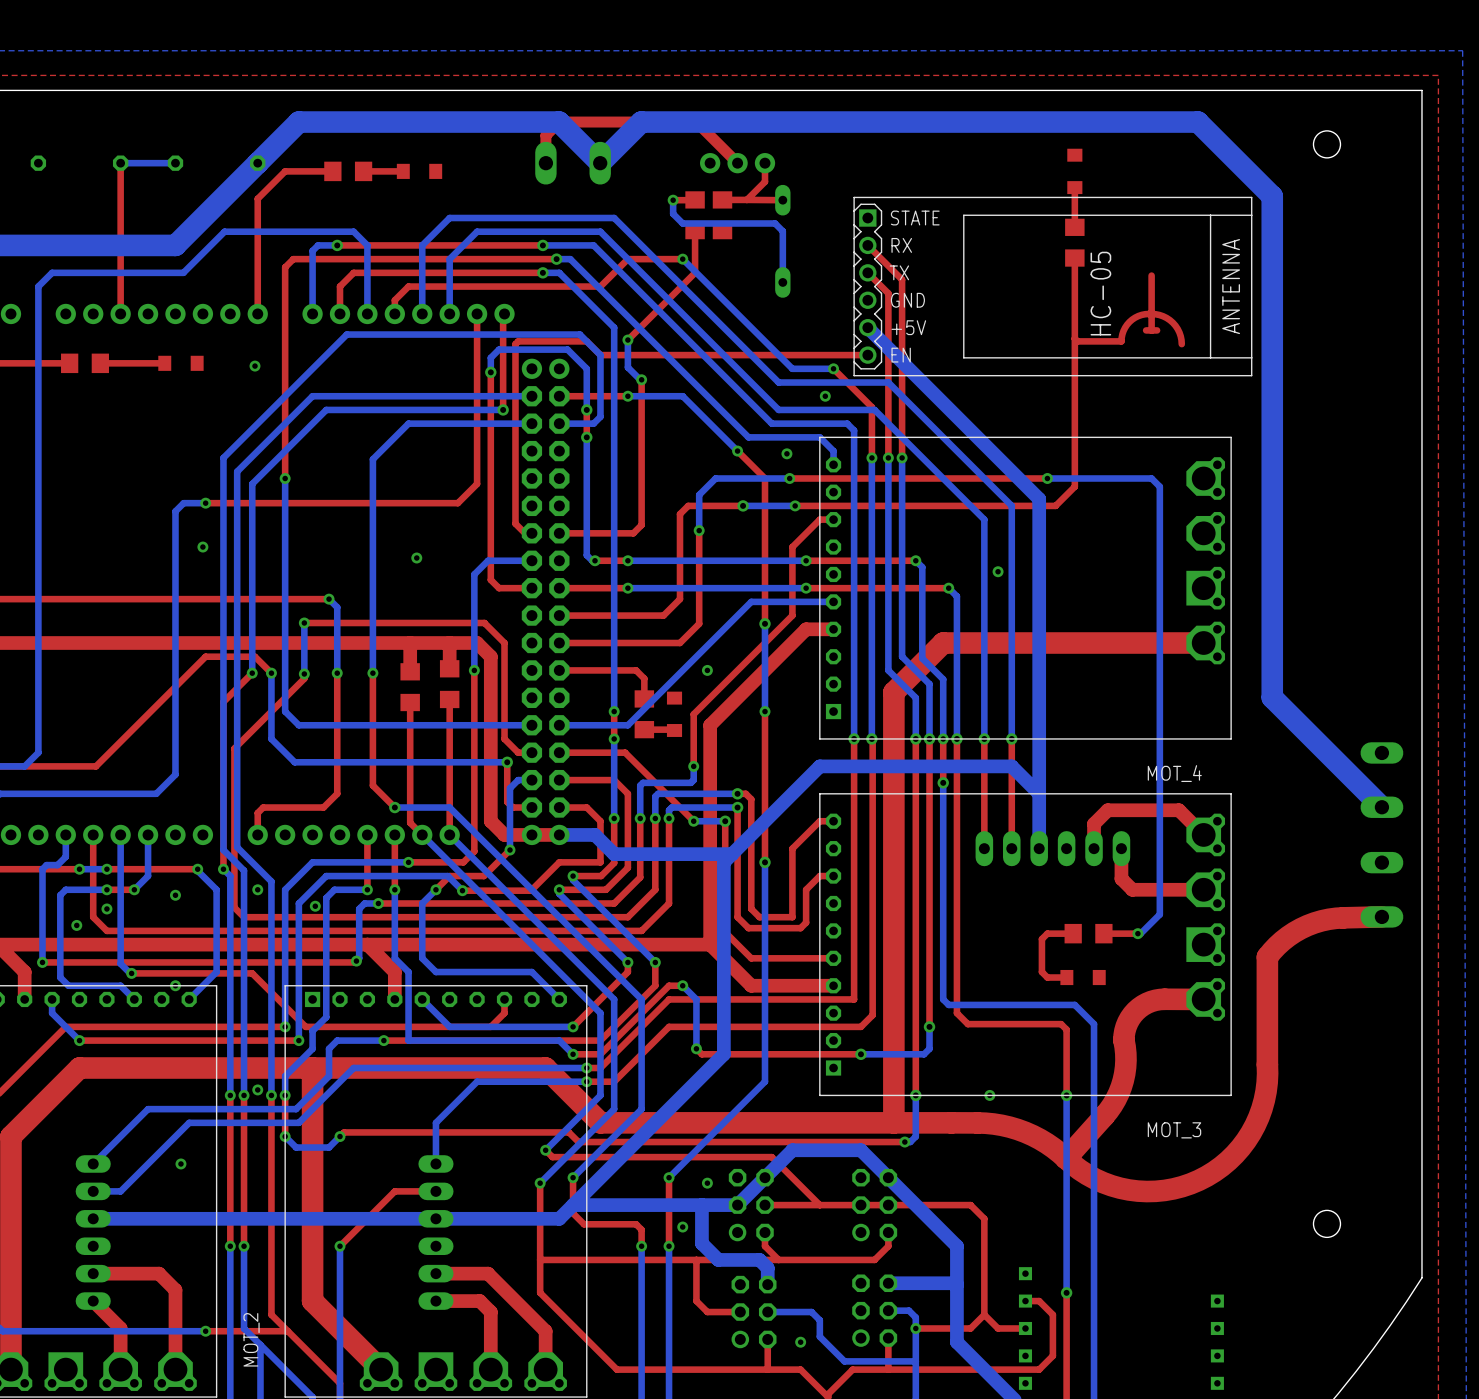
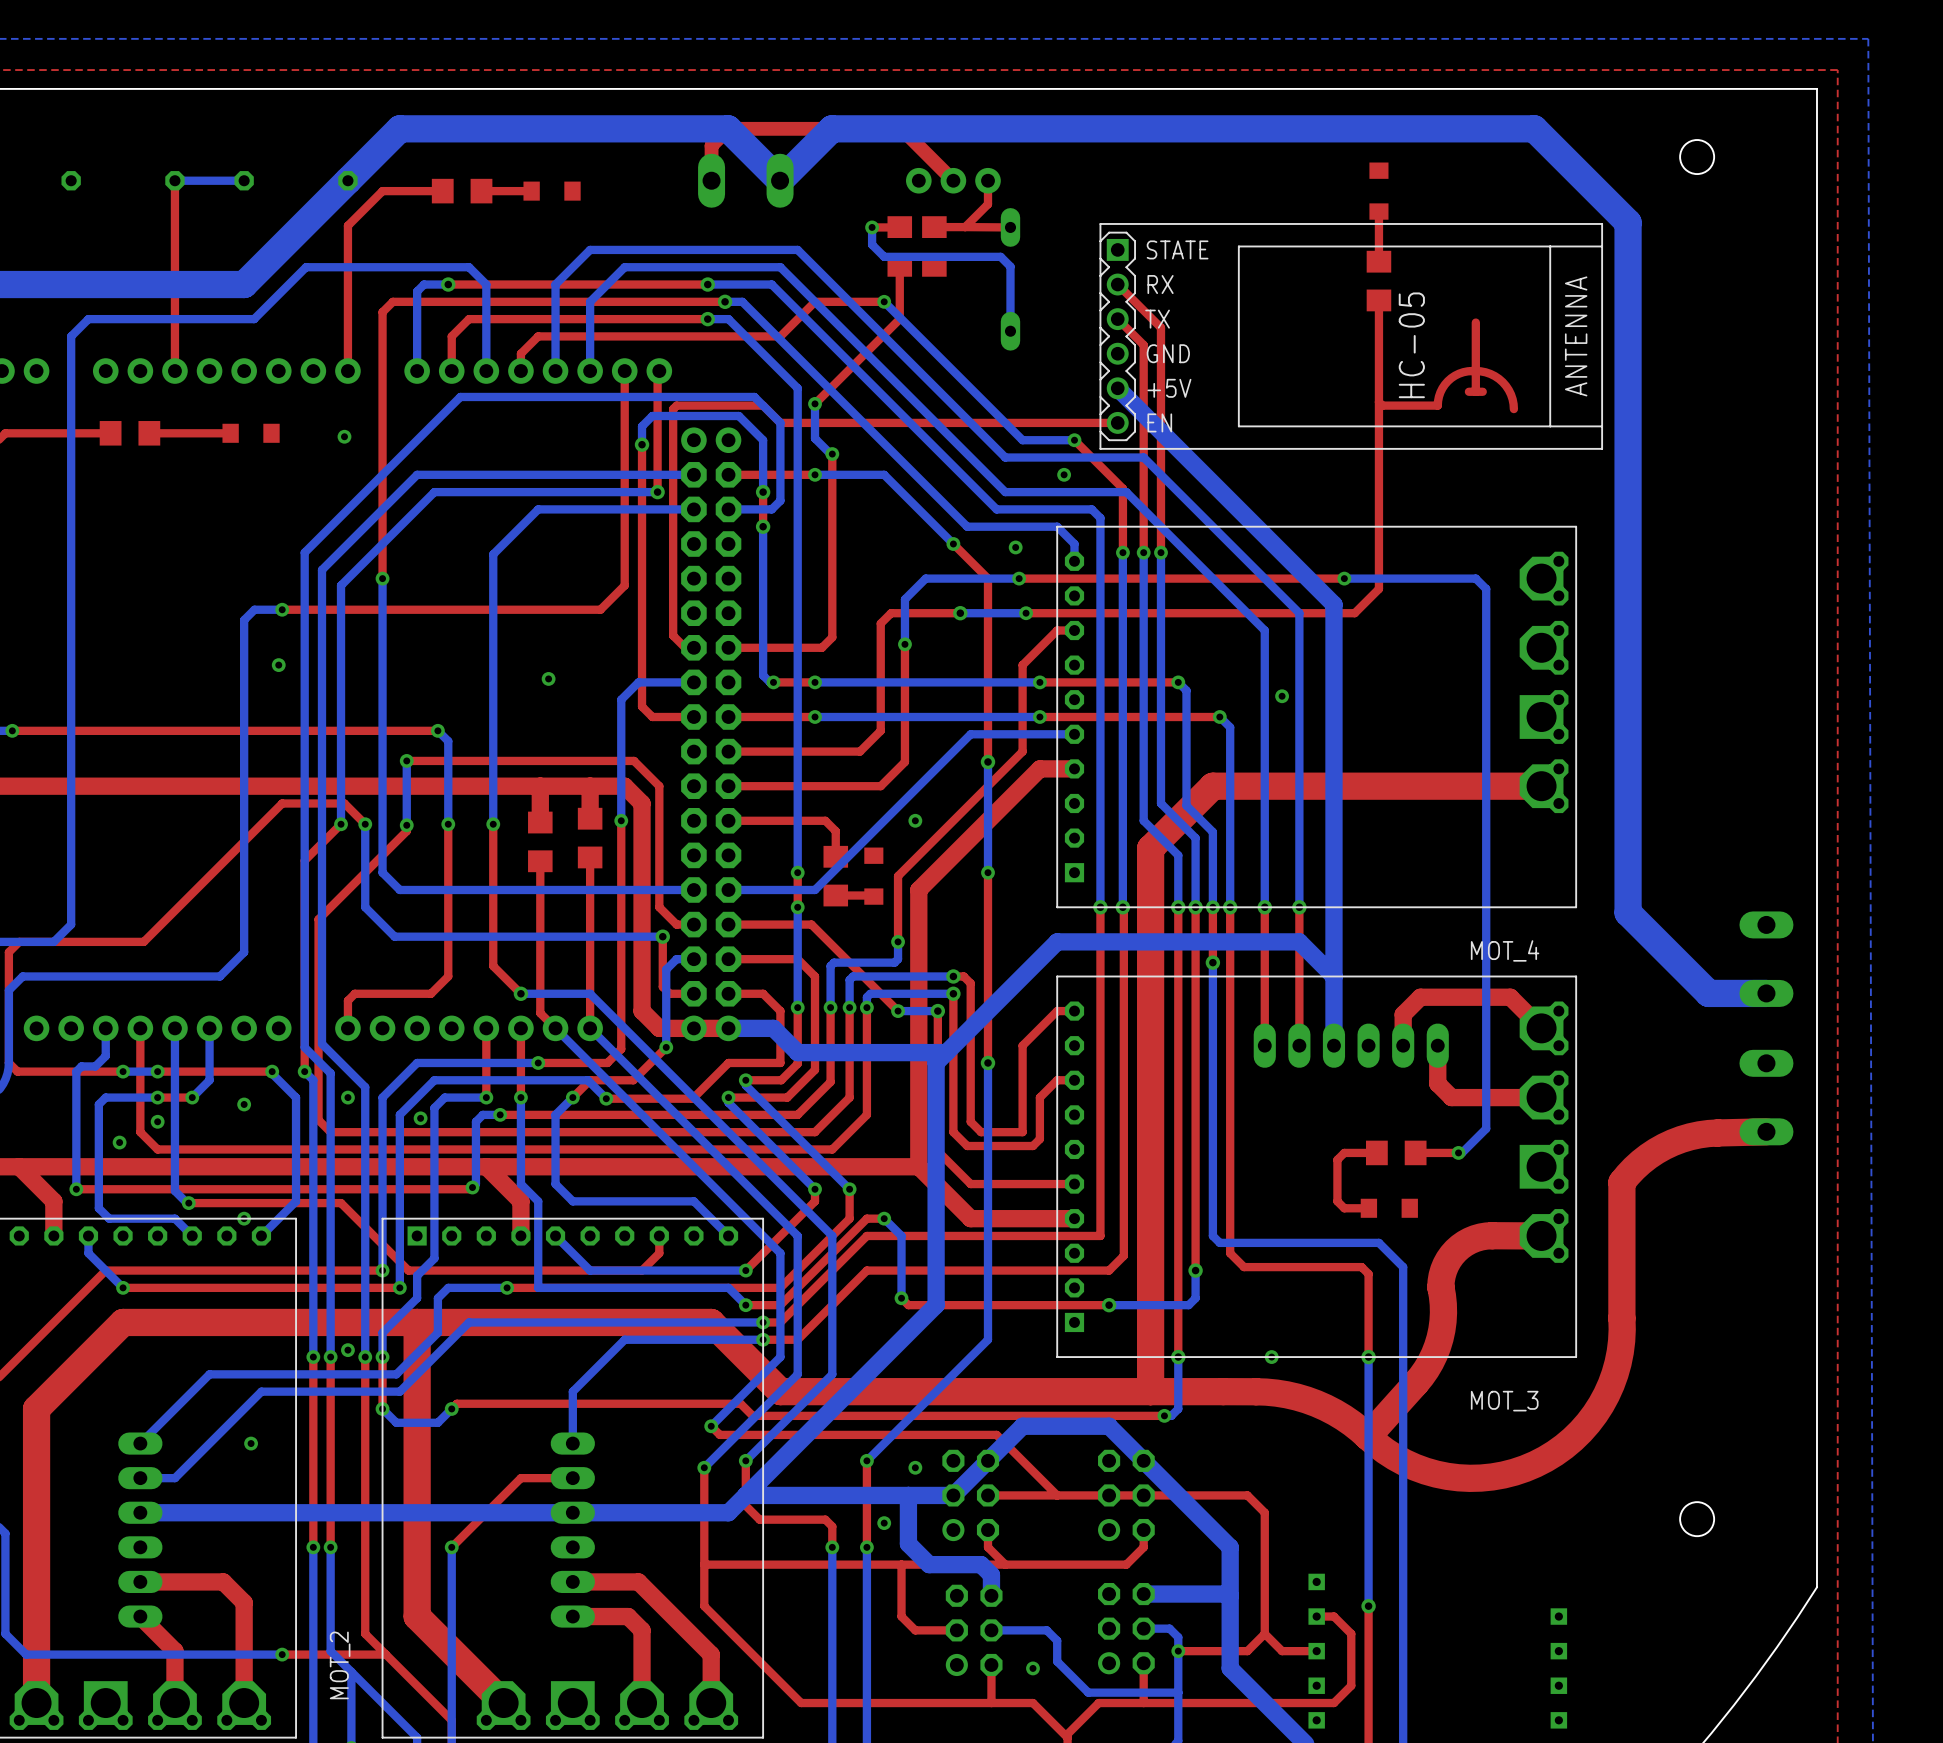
bottom track: (1272, 697) (1381, 807) -> (1628, 855) (1628, 912) (1708, 993) (1766, 993)

